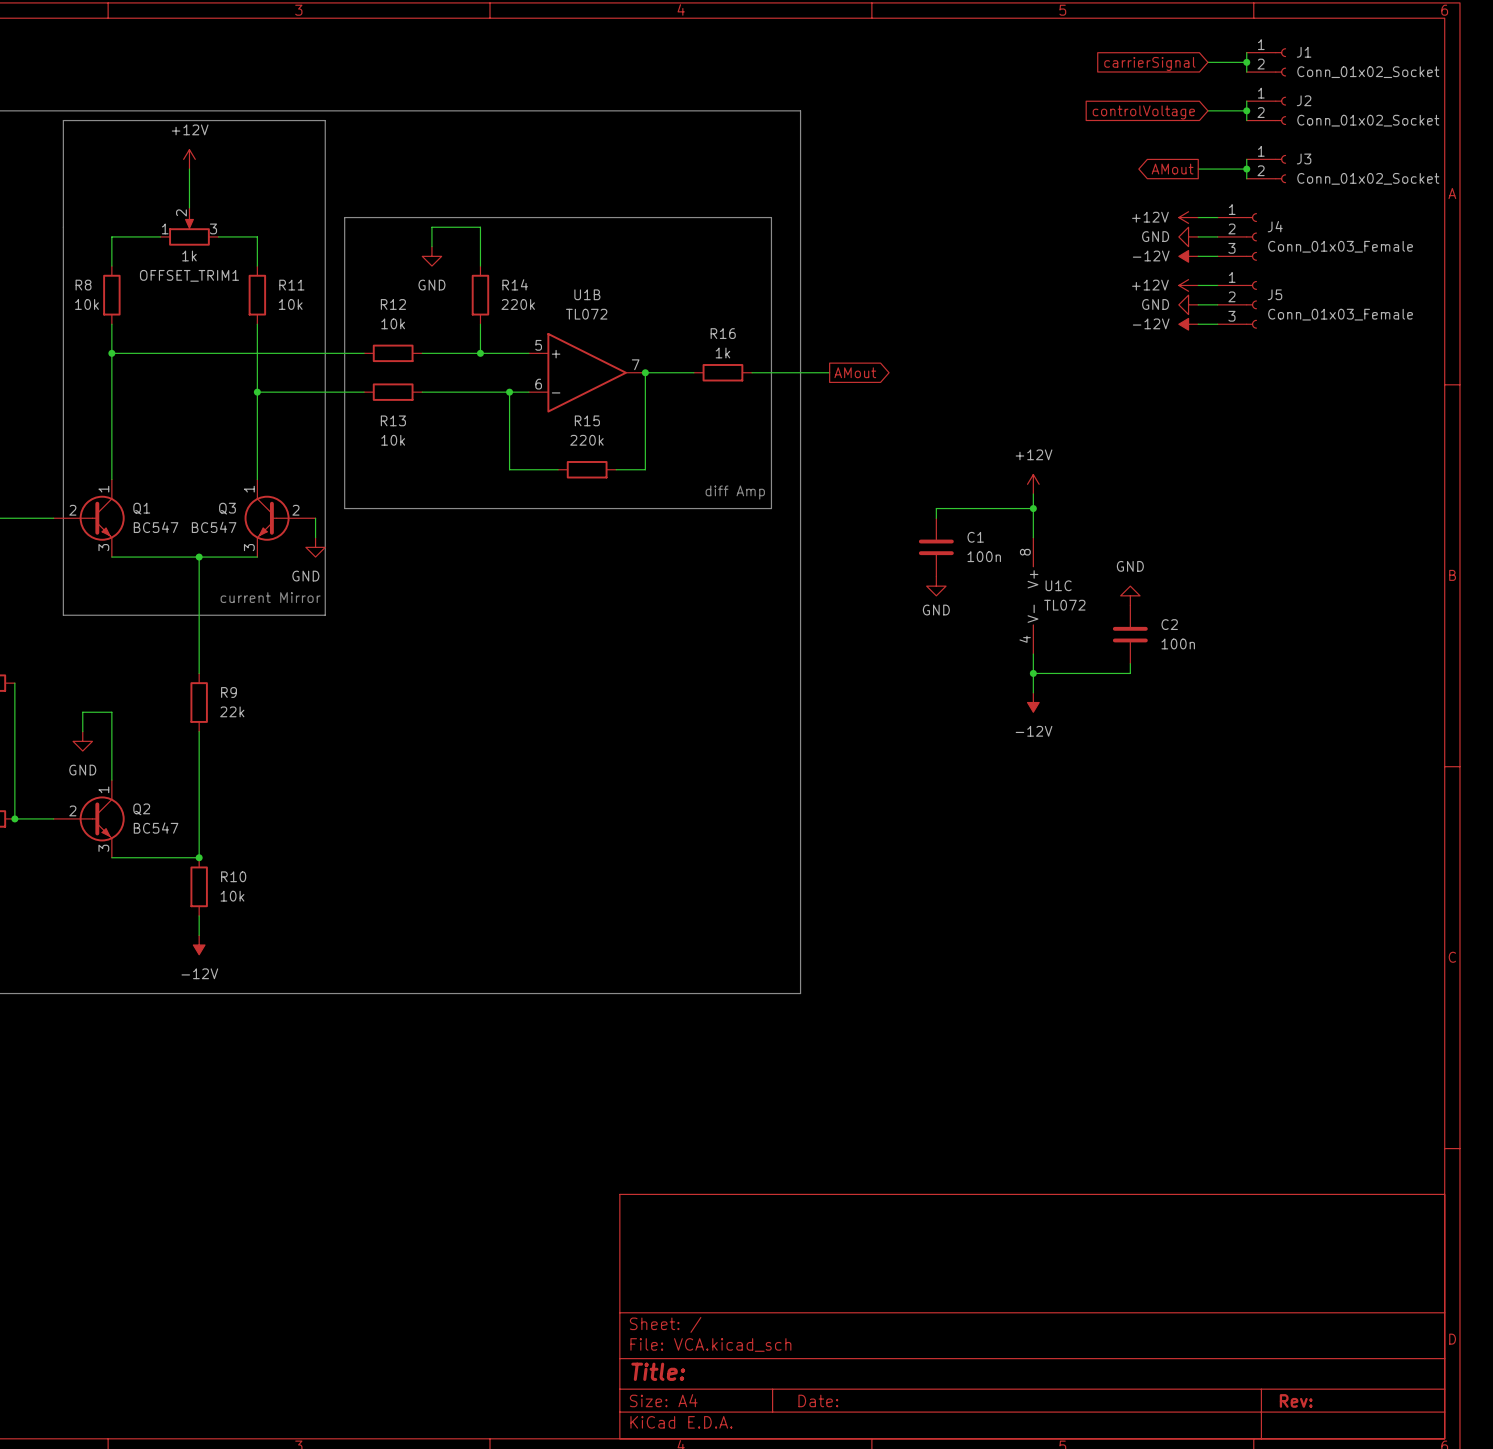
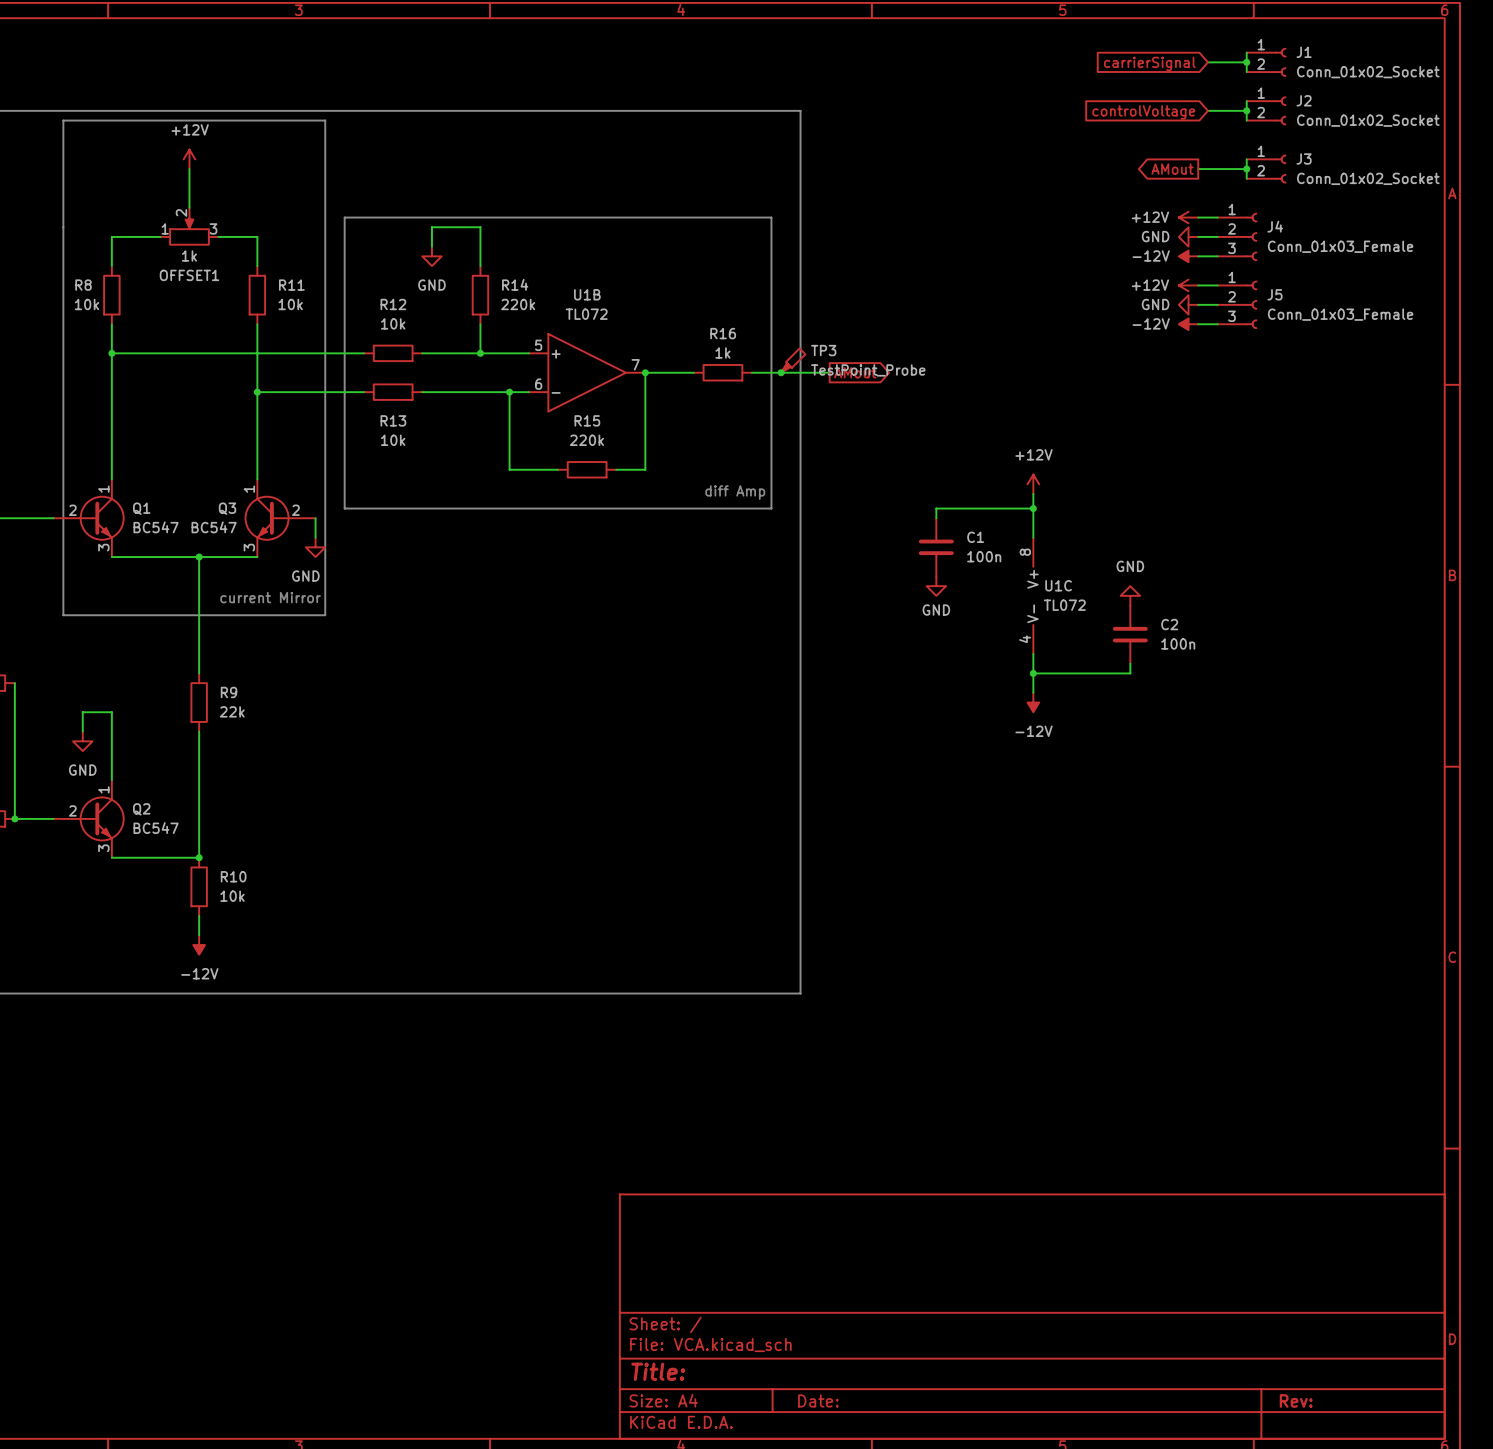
OFFSET_TRIM1 name: OFFSET_TRIM1 (189, 275) -> OFFSET1 (189, 275)
TP3: none -> TestPoint_Probe (793, 360)
junction: none -> (781, 372)

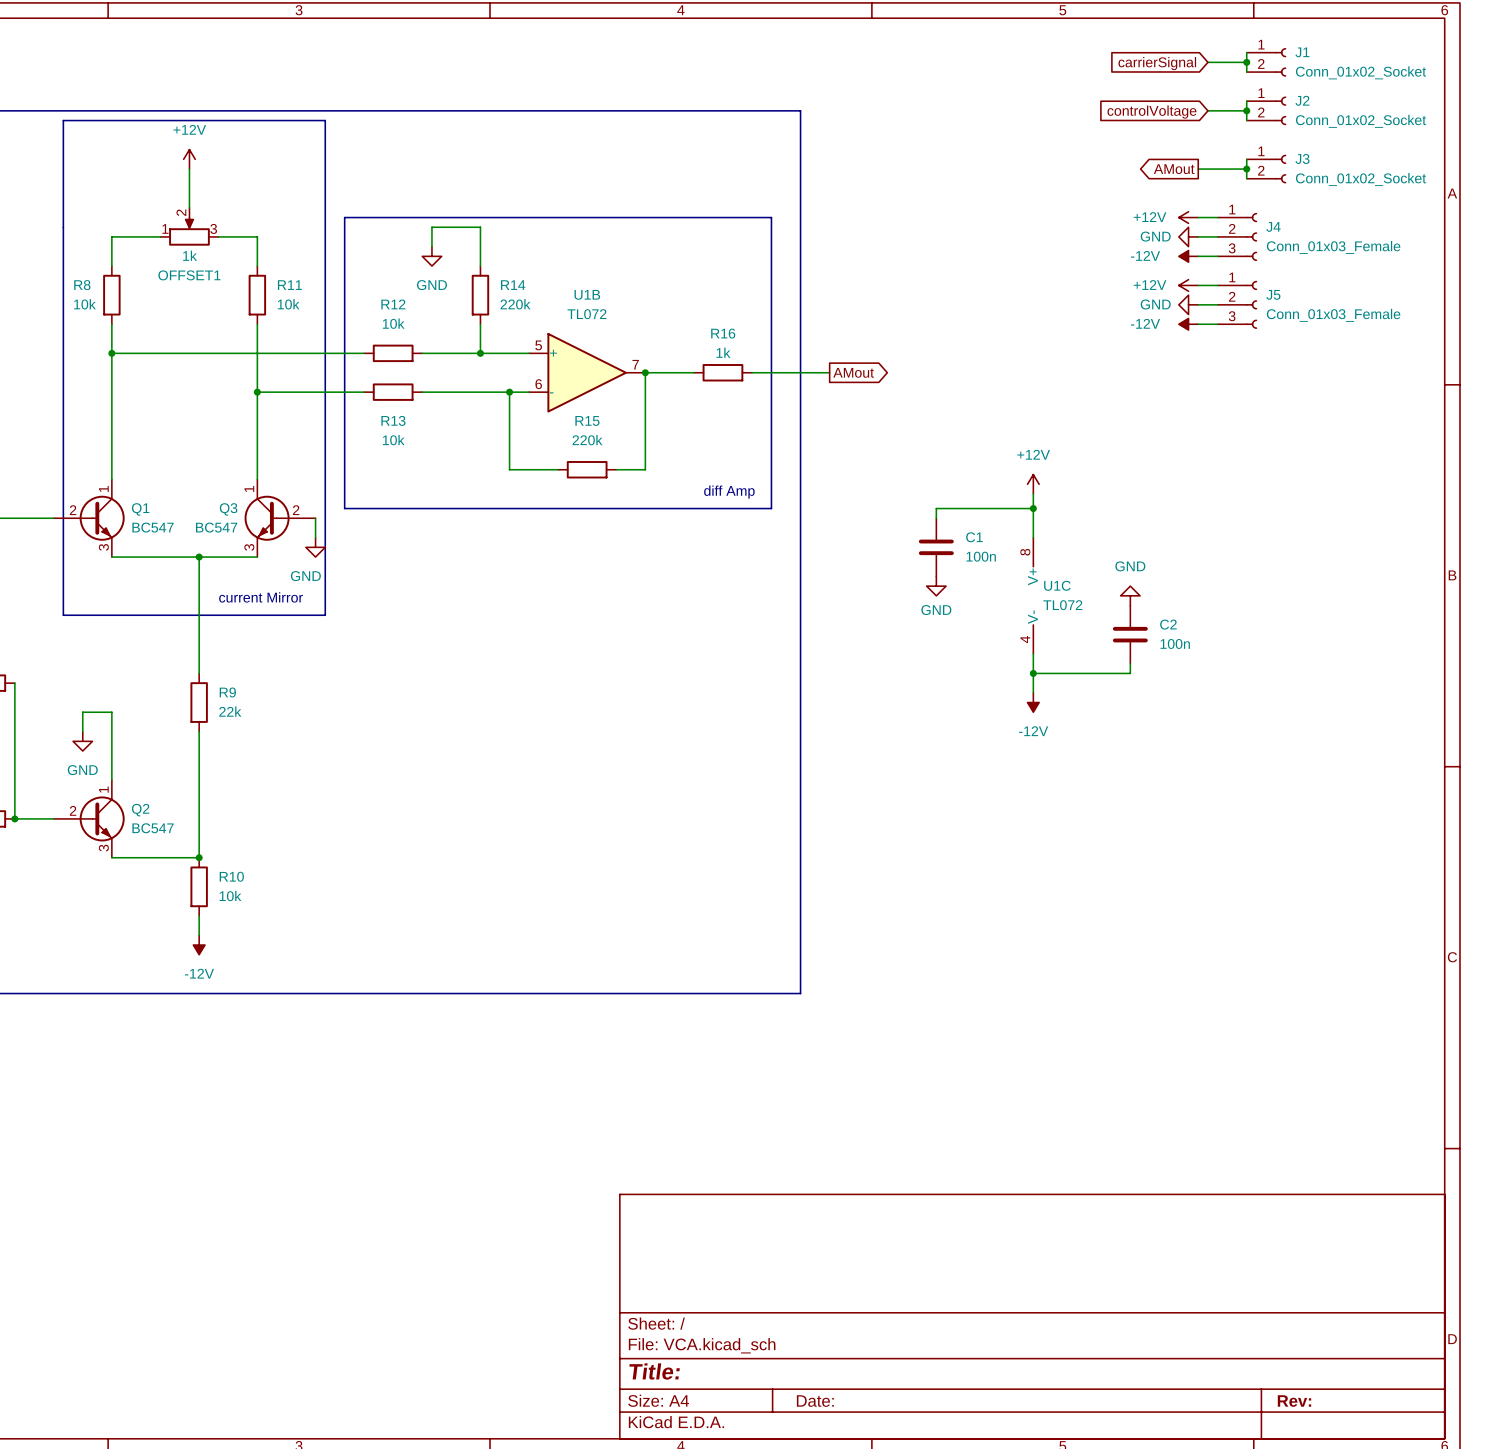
TP3: TestPoint_Probe (793, 360) -> none
junction: (781, 372) -> none

